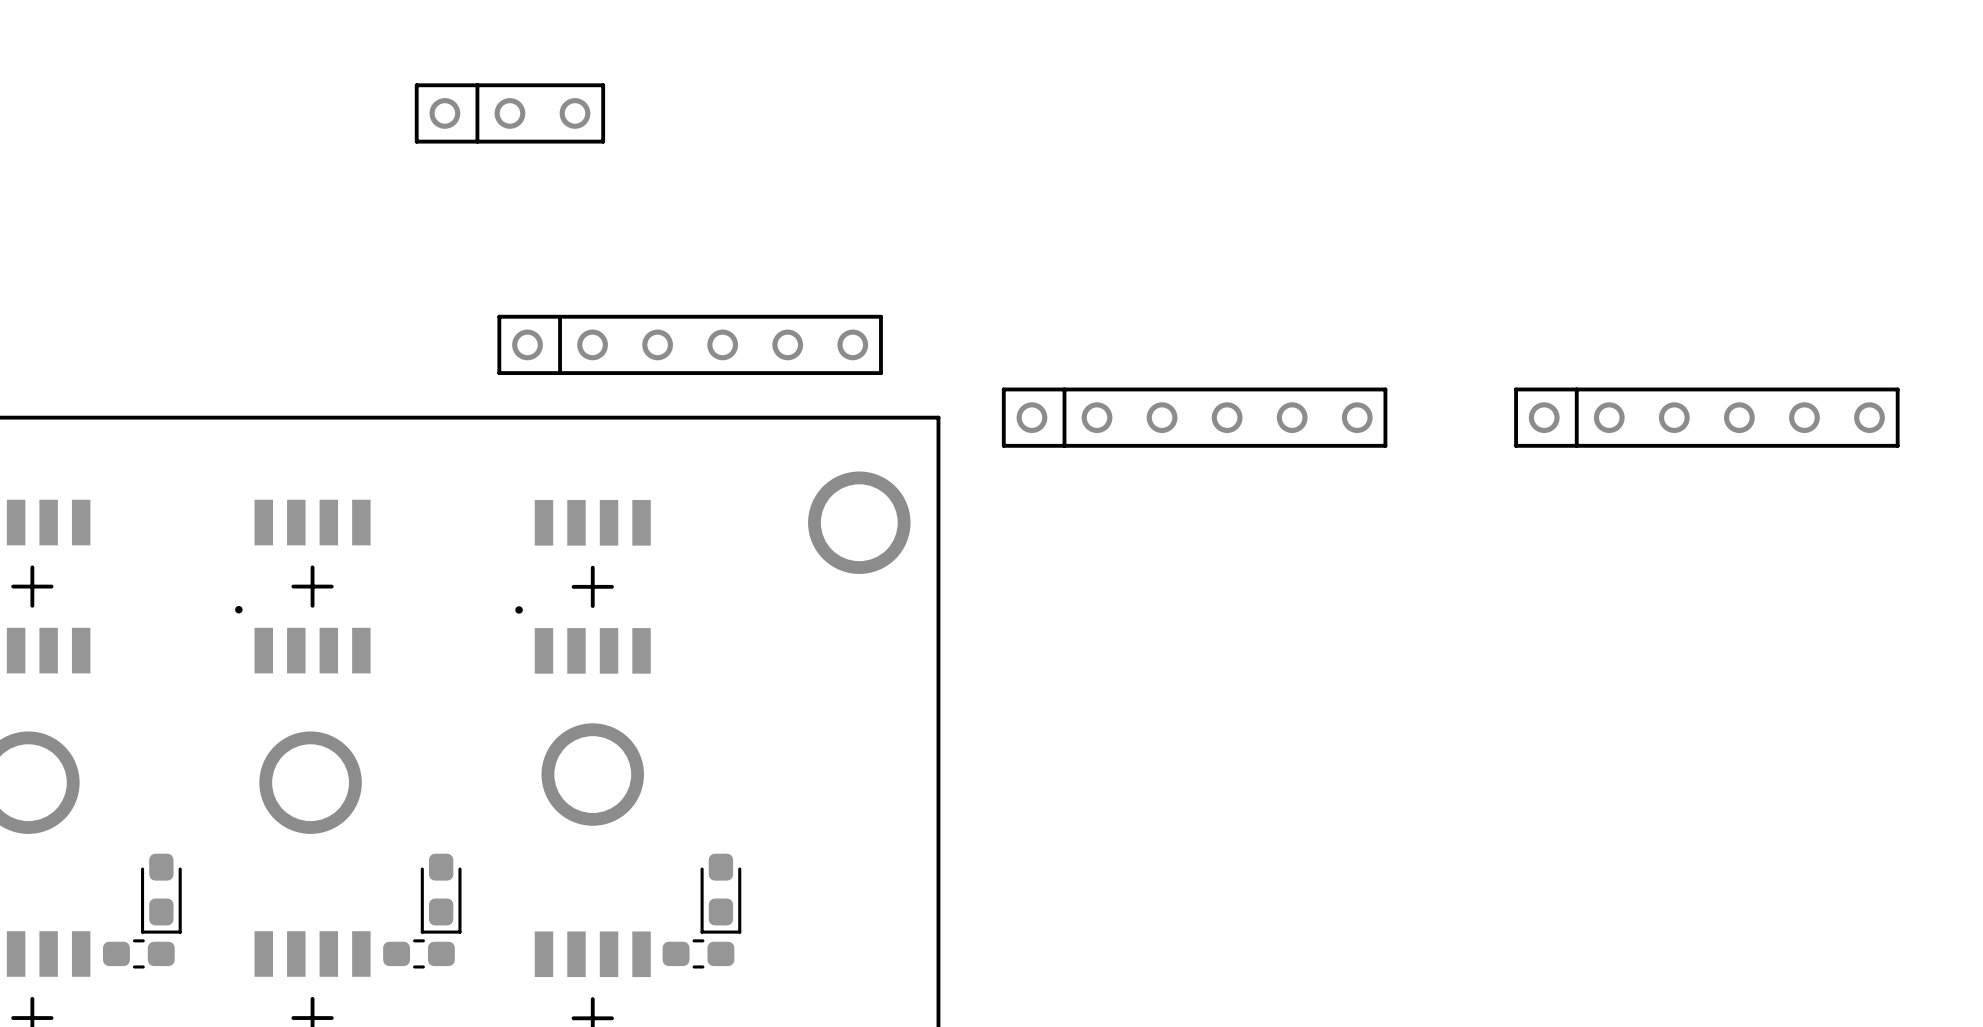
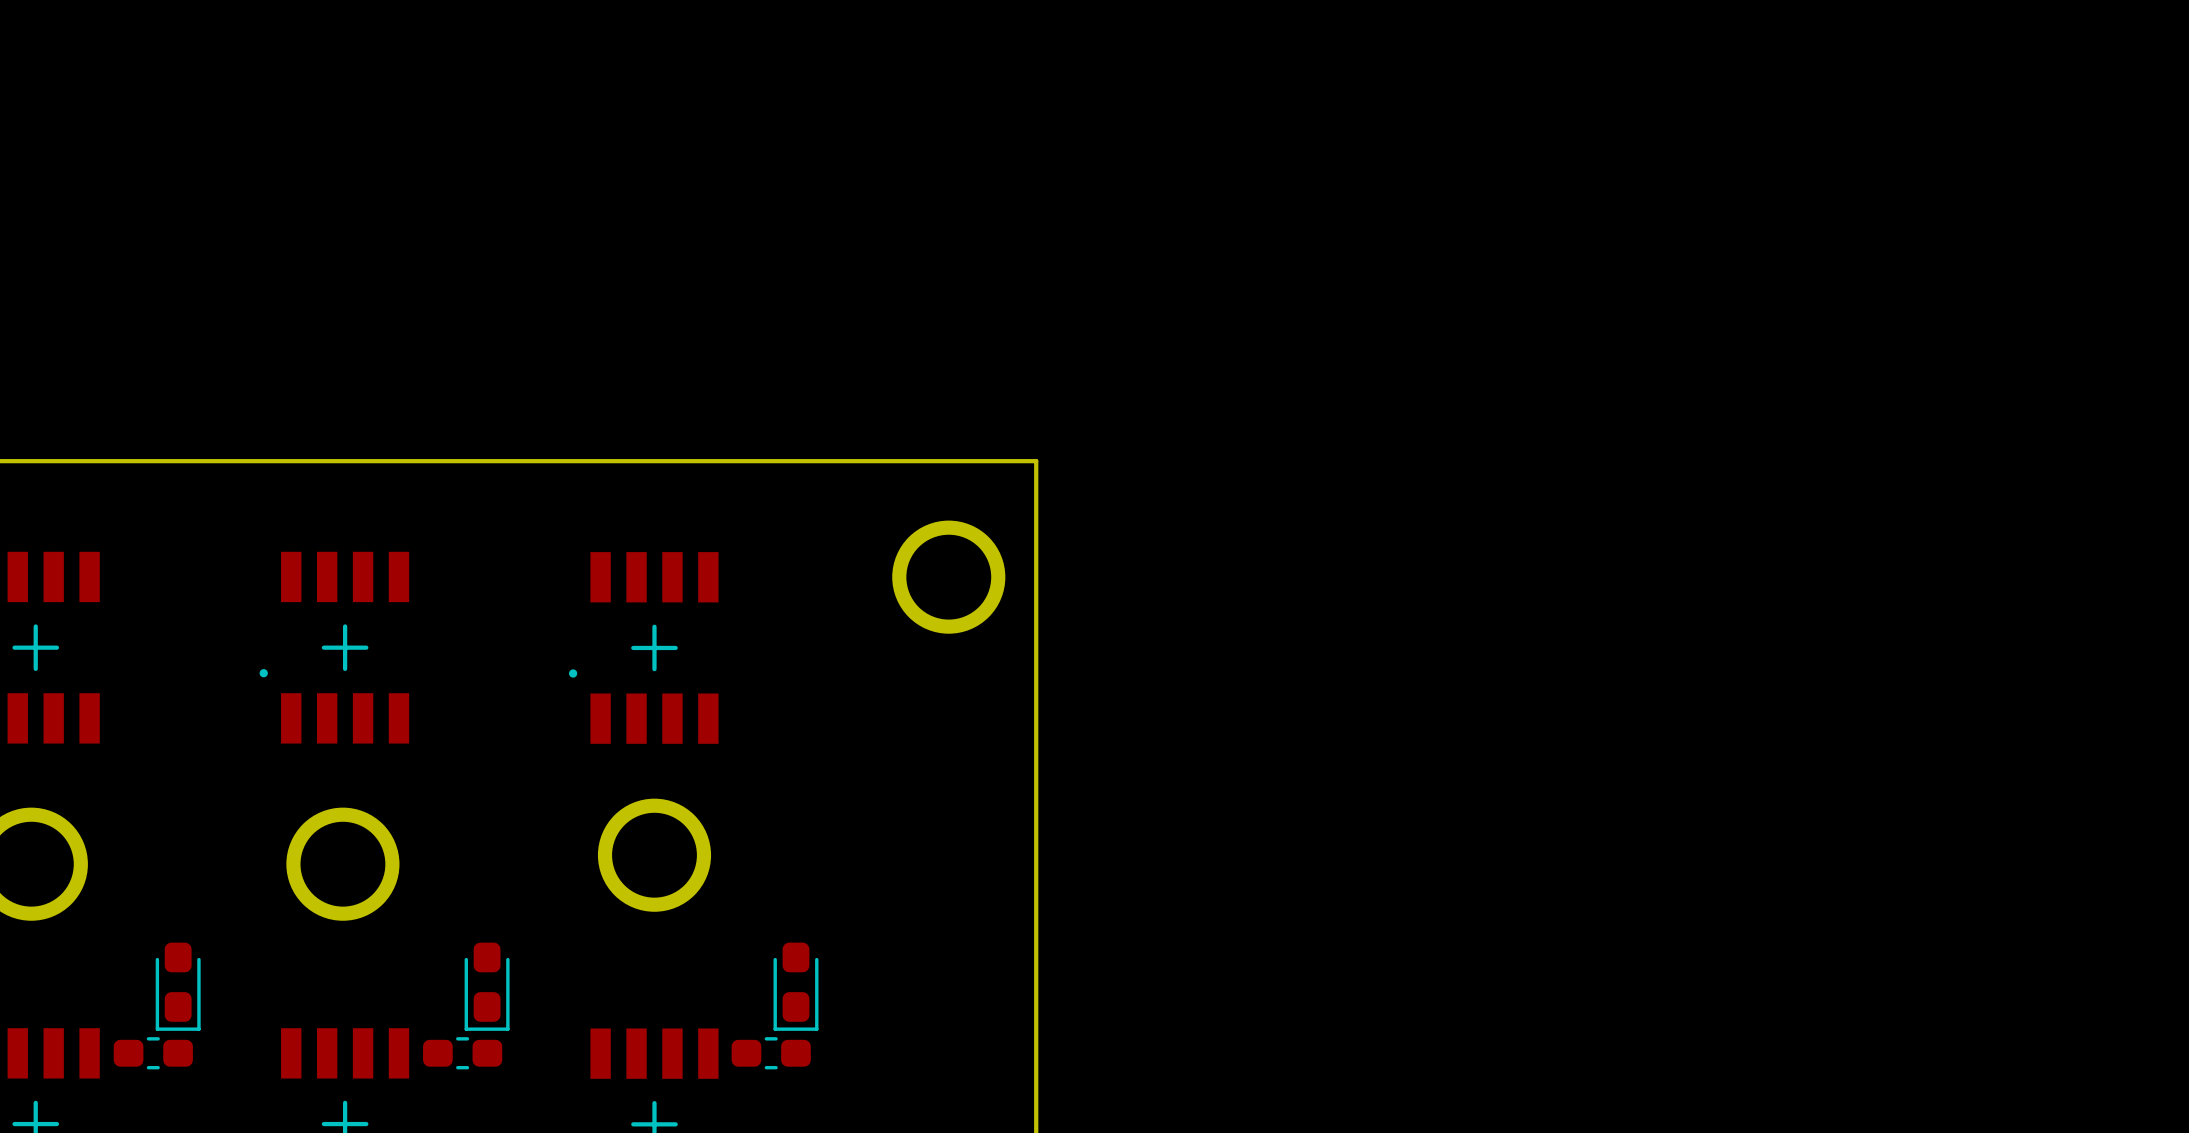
part: (509, 113) -> none
part: (690, 344) -> none
part: (1194, 417) -> none
part: (1706, 417) -> none

